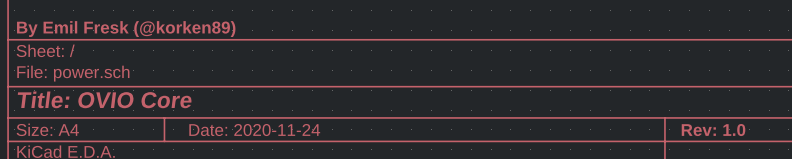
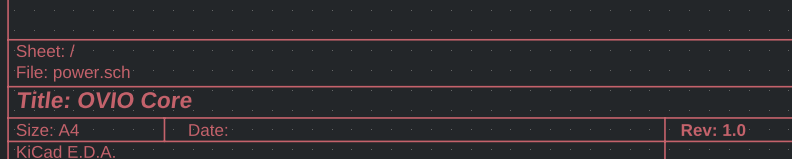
title block: By Emil Fresk (@korken89) (126, 29) -> none
title block: Date: 2020-11-24 (254, 130) -> Date: (208, 130)

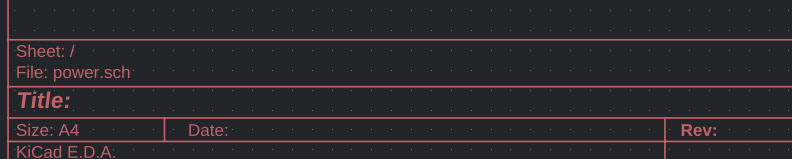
title block: Title: OVIO Core (104, 99) -> Title: (43, 99)
title block: Rev: 1.0 (713, 130) -> Rev: (698, 130)

